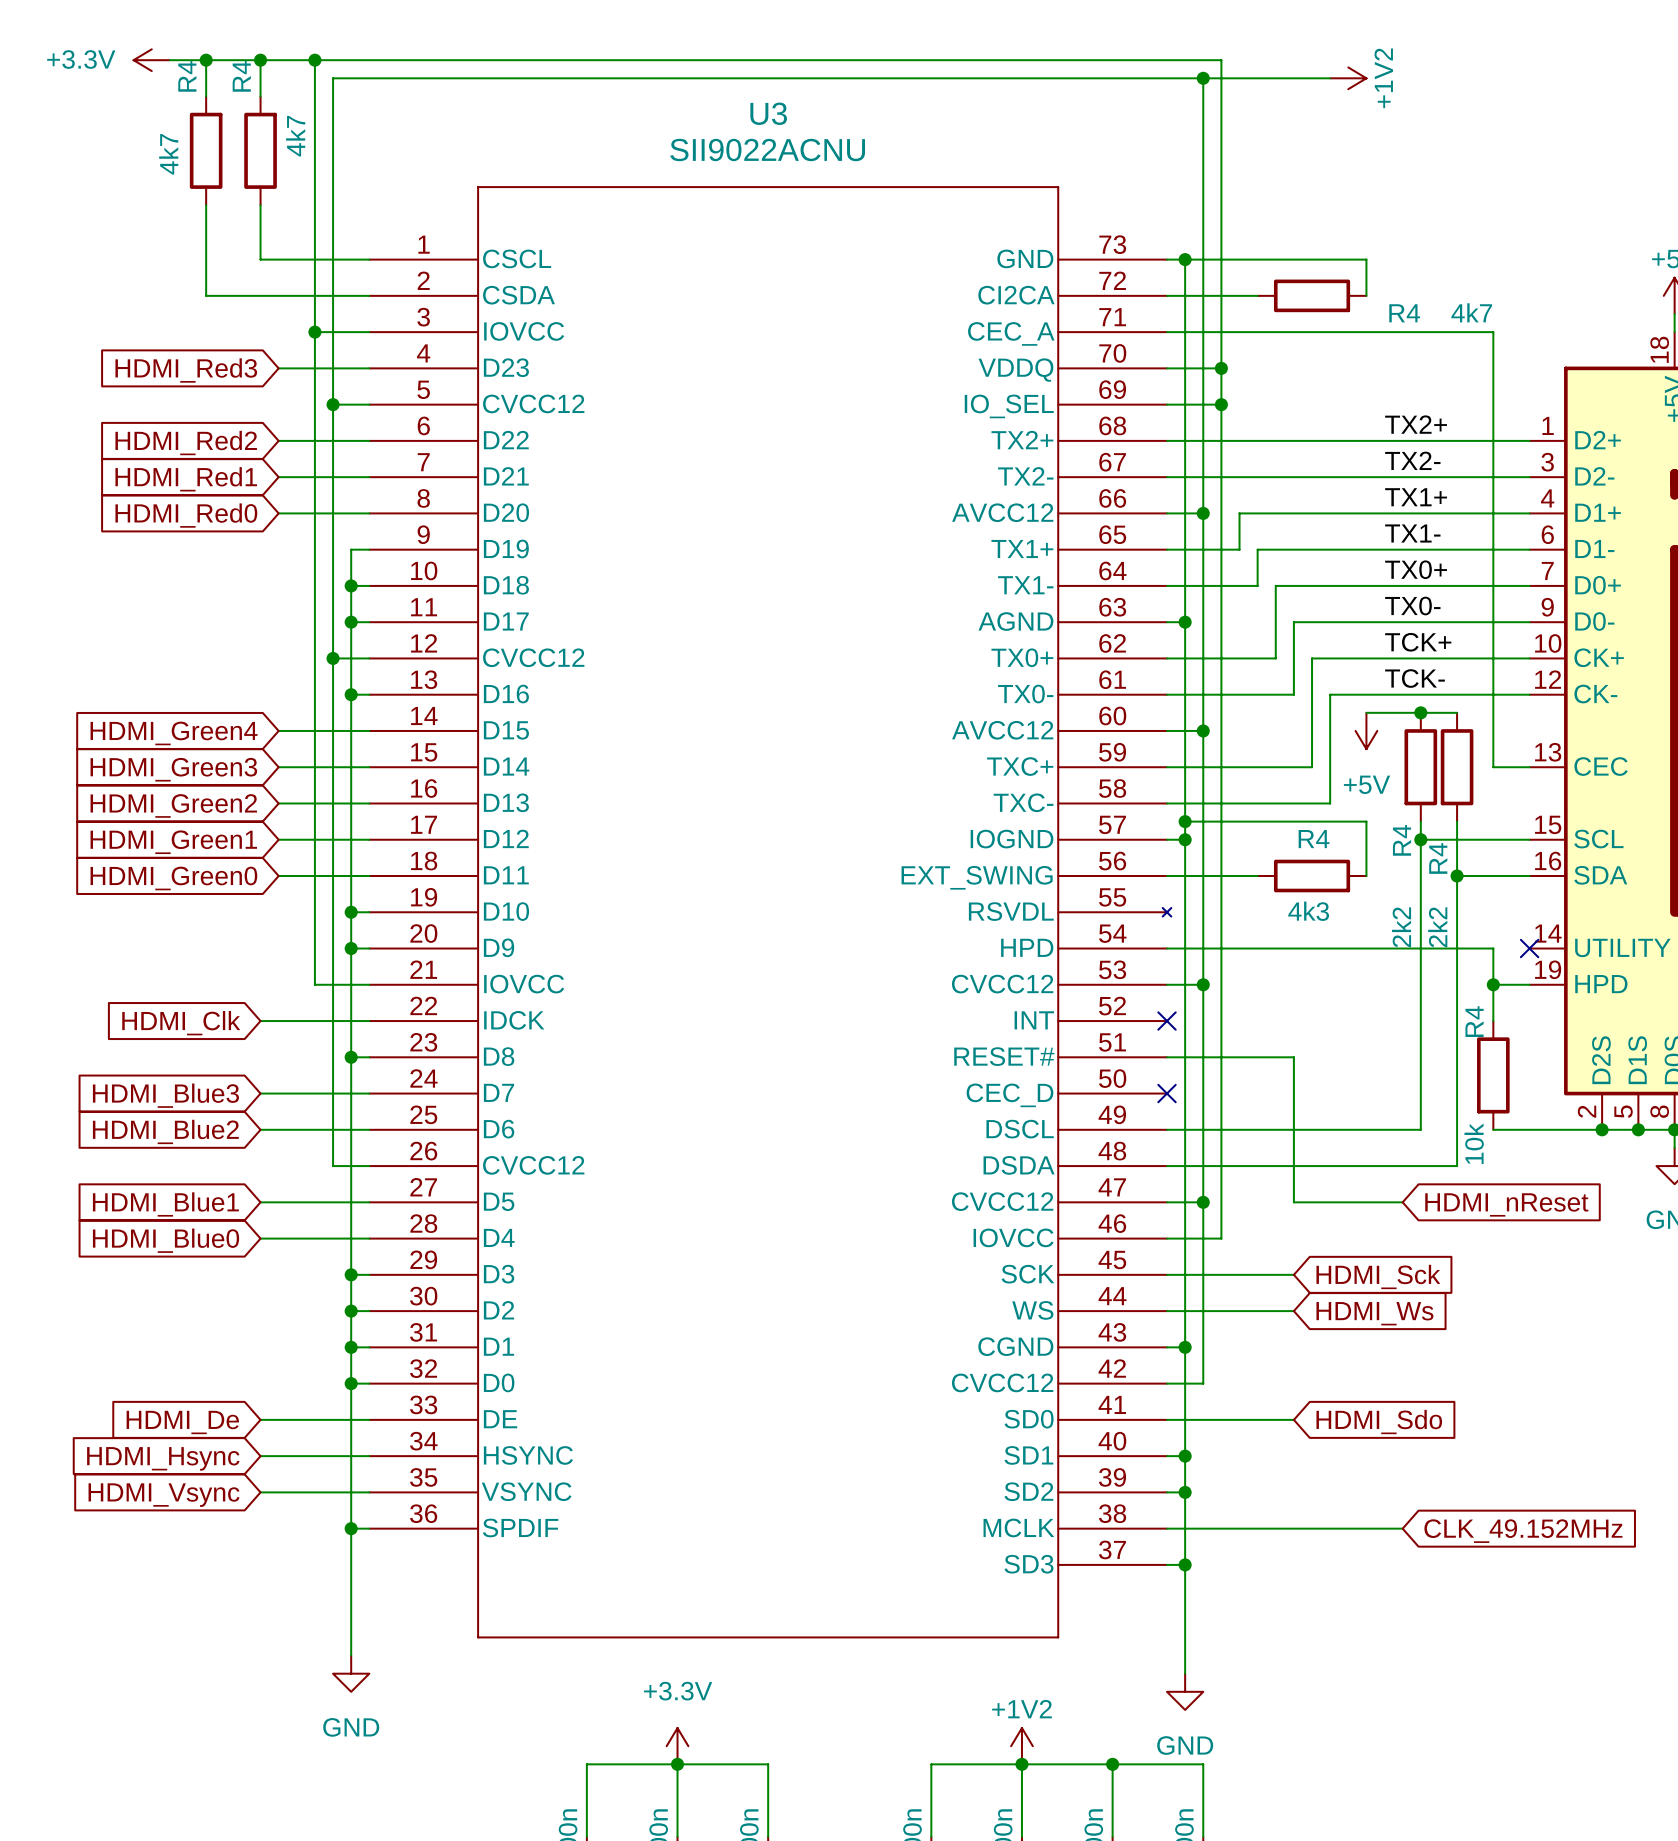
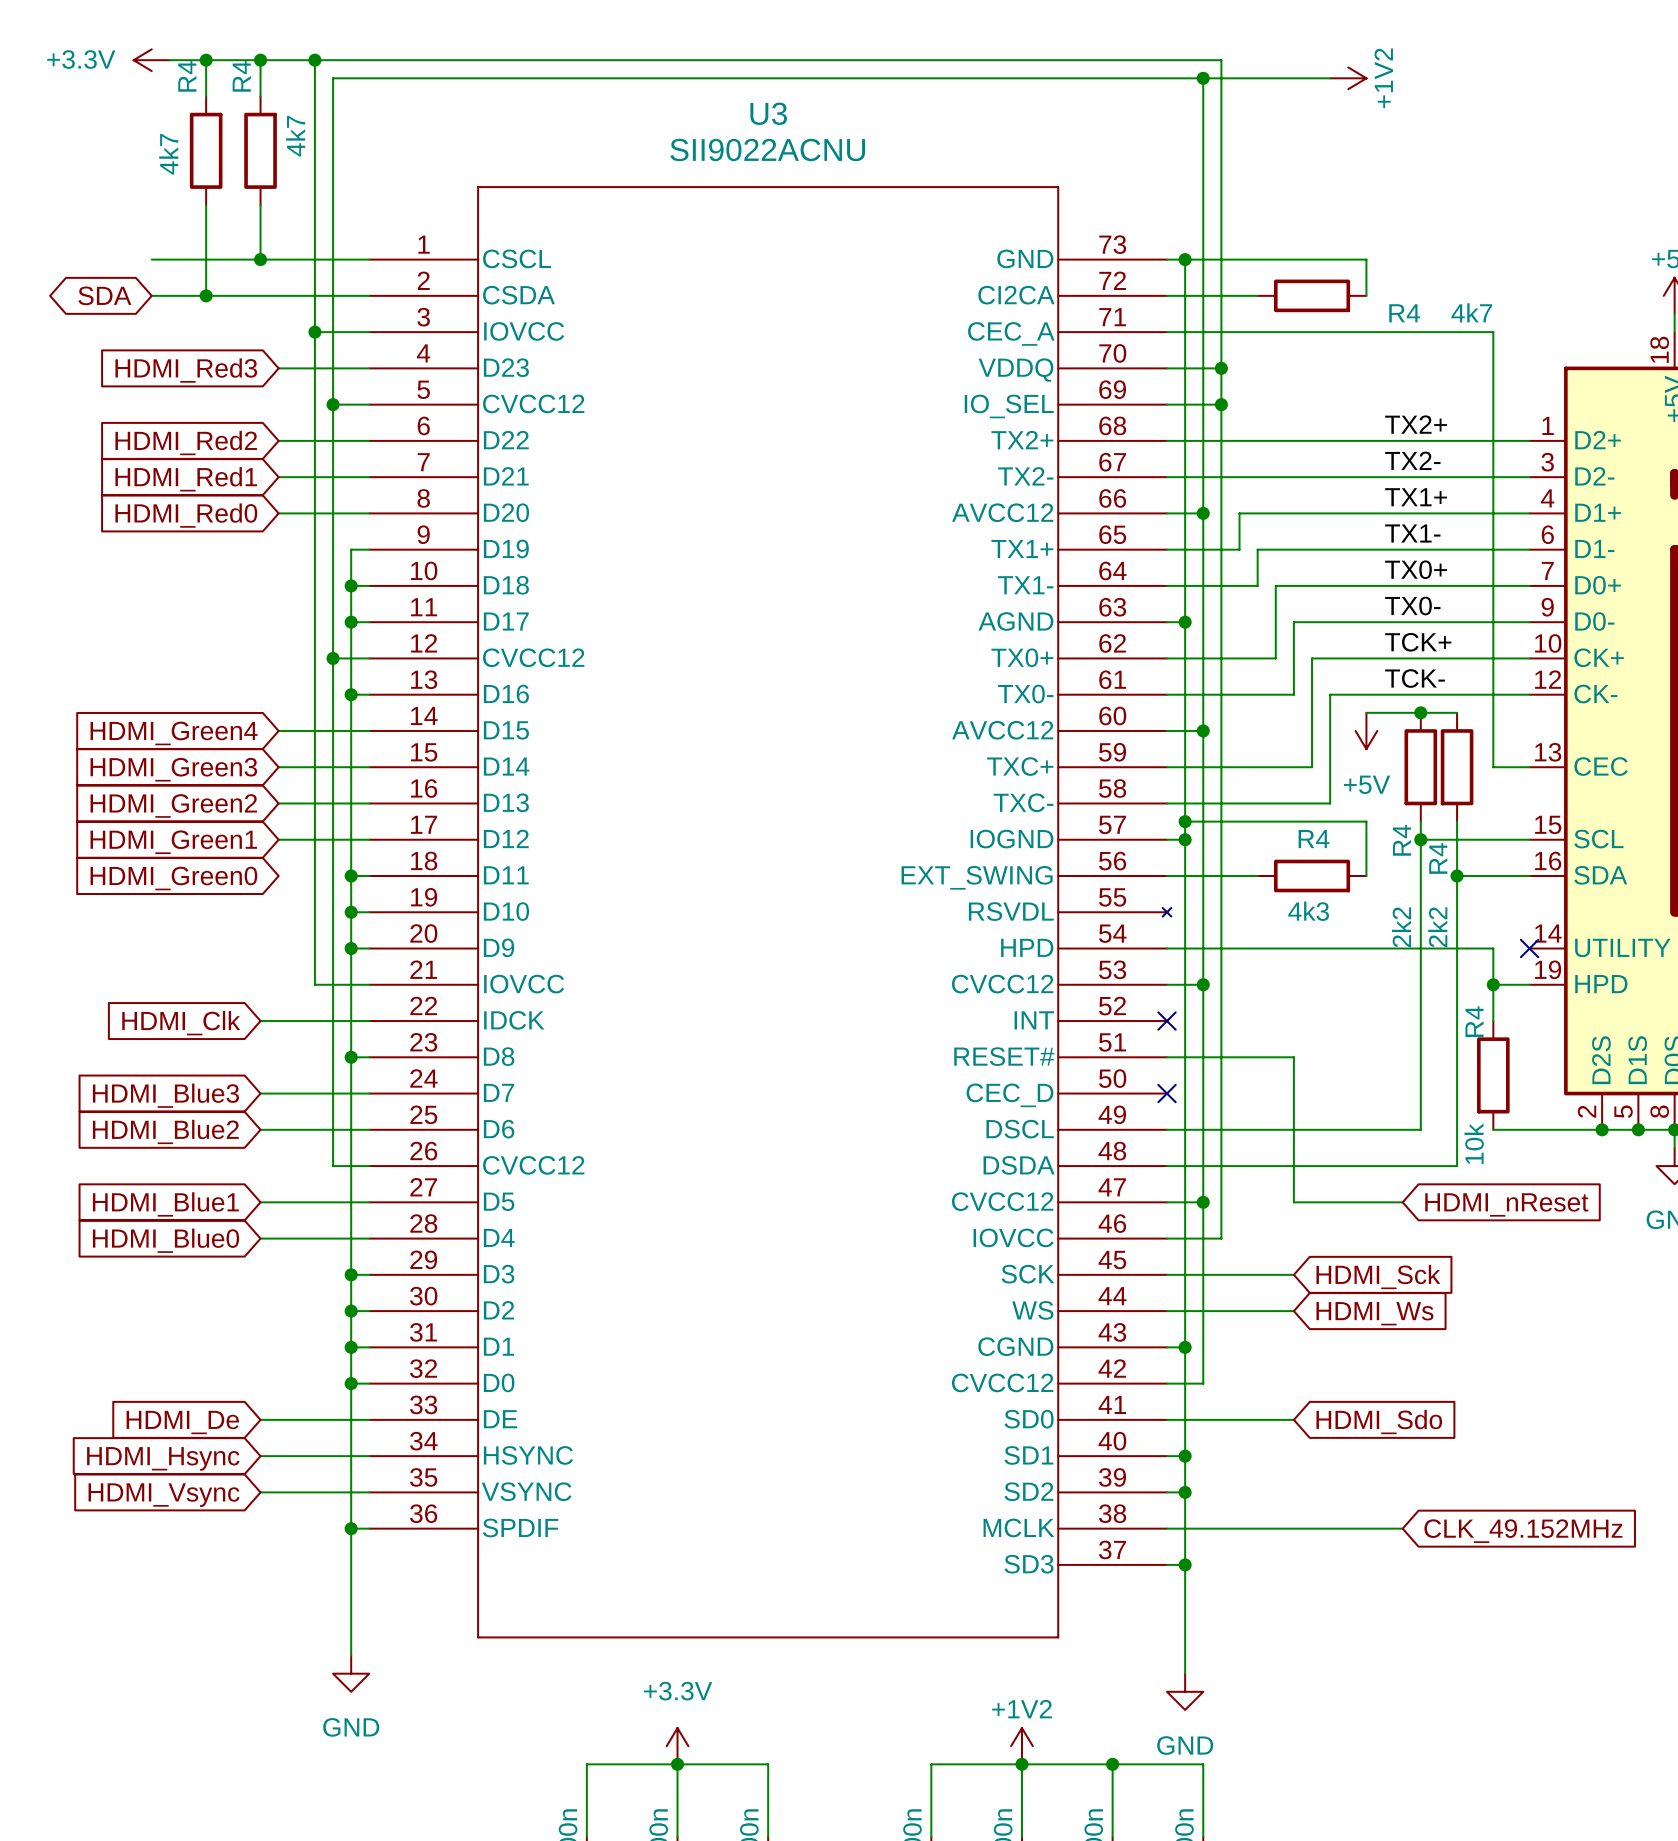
wire: none -> (151, 259) (260, 259)
junction: none -> (260, 259)
global label: none -> SDA (104, 295)
wire: none -> (151, 295) (206, 295)
junction: none -> (206, 295)
wire: (278, 876) (351, 876) -> none
junction: none -> (351, 876)

